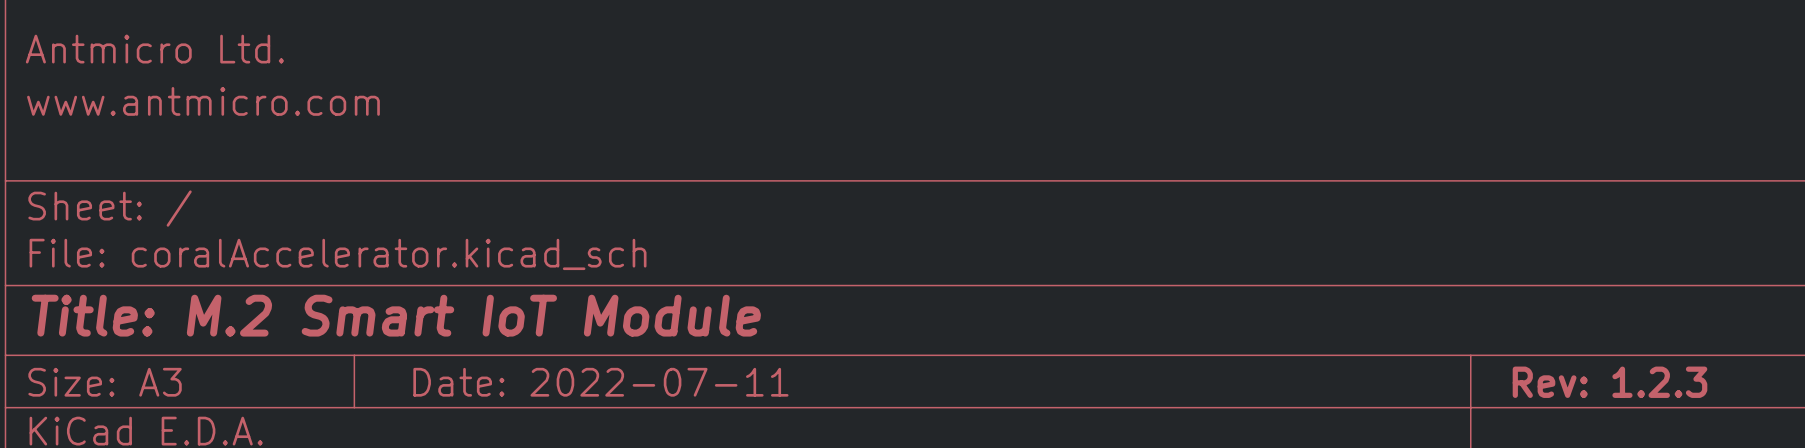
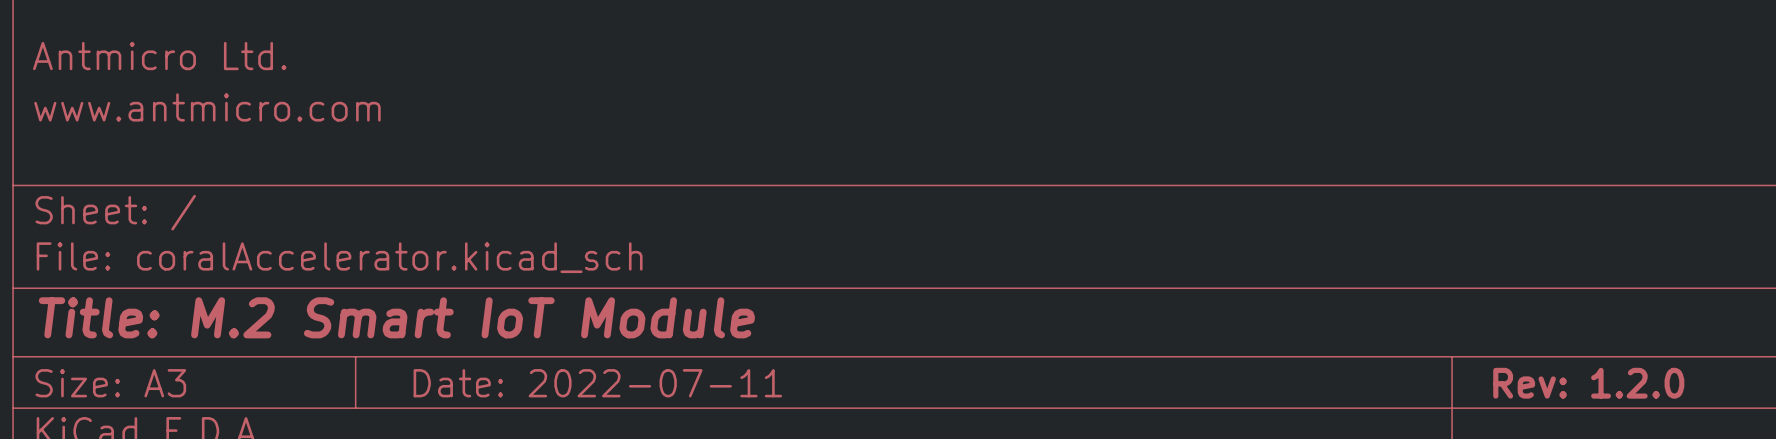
title block: Rev: 1.2.3 (1610, 382) -> Rev: 1.2.0 (1588, 383)

